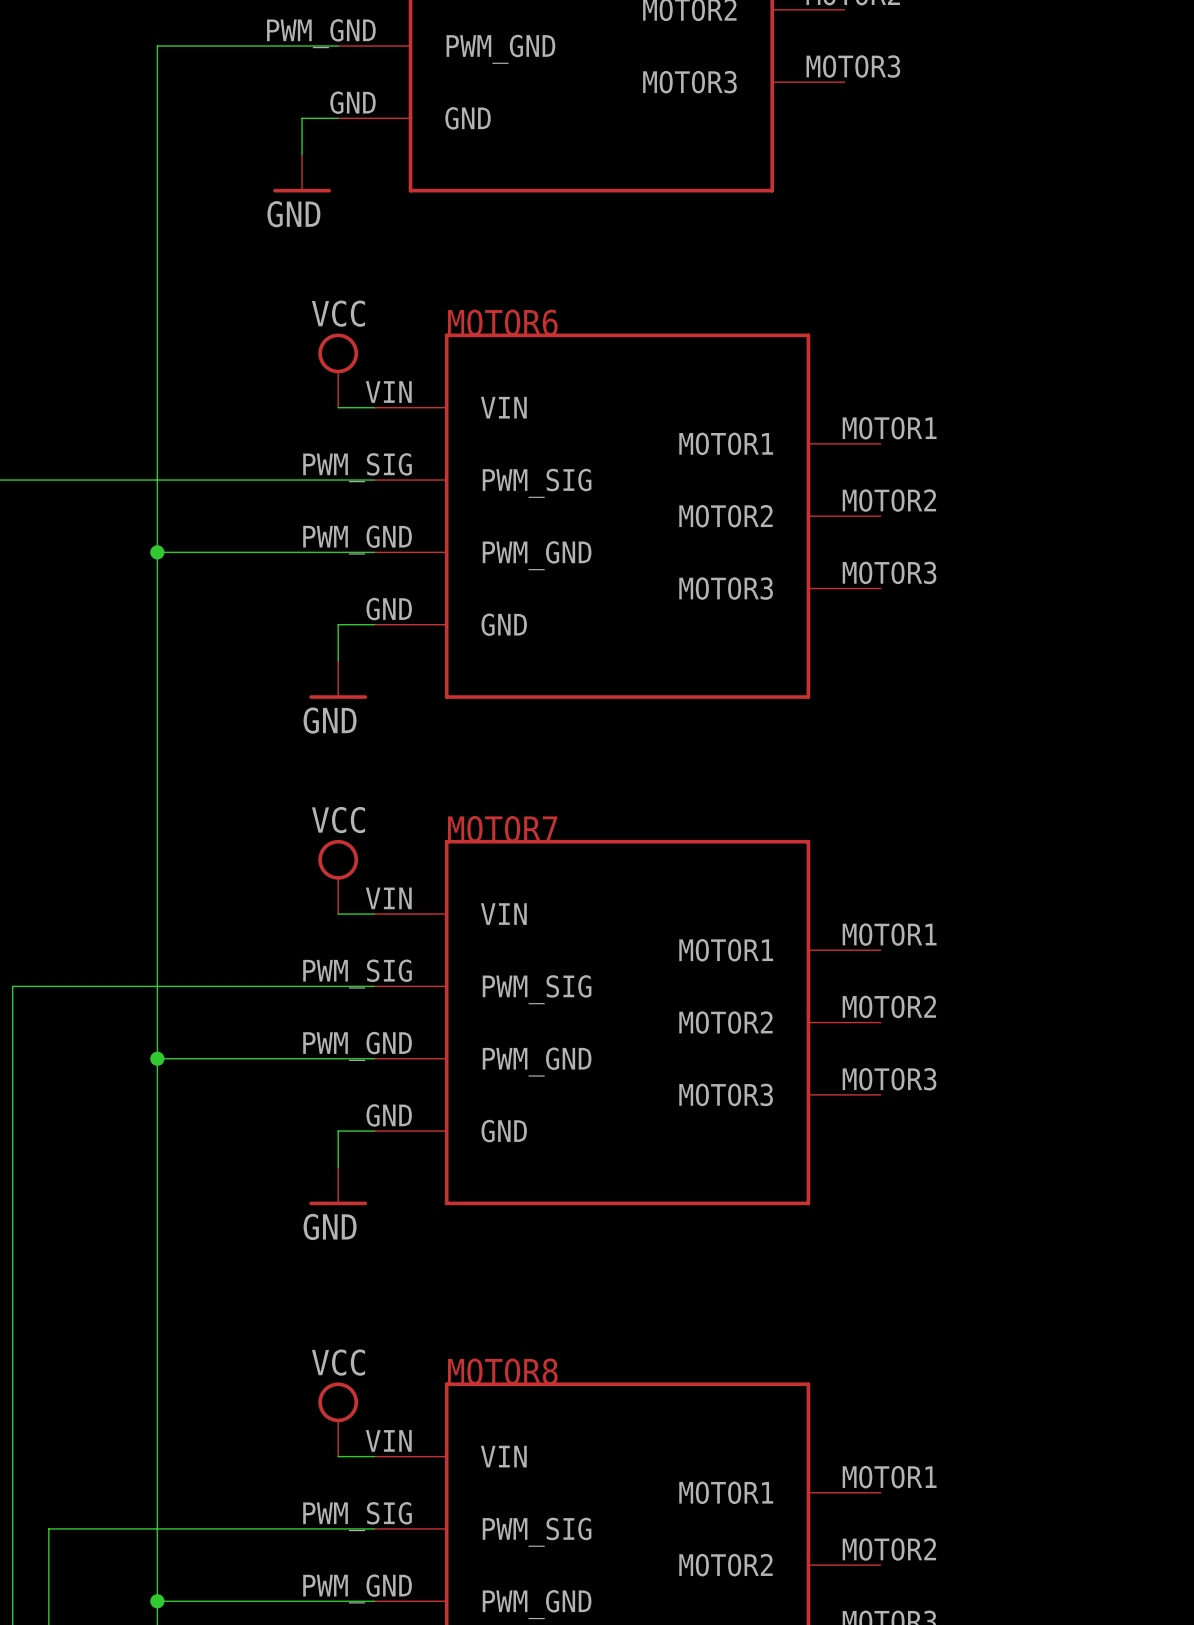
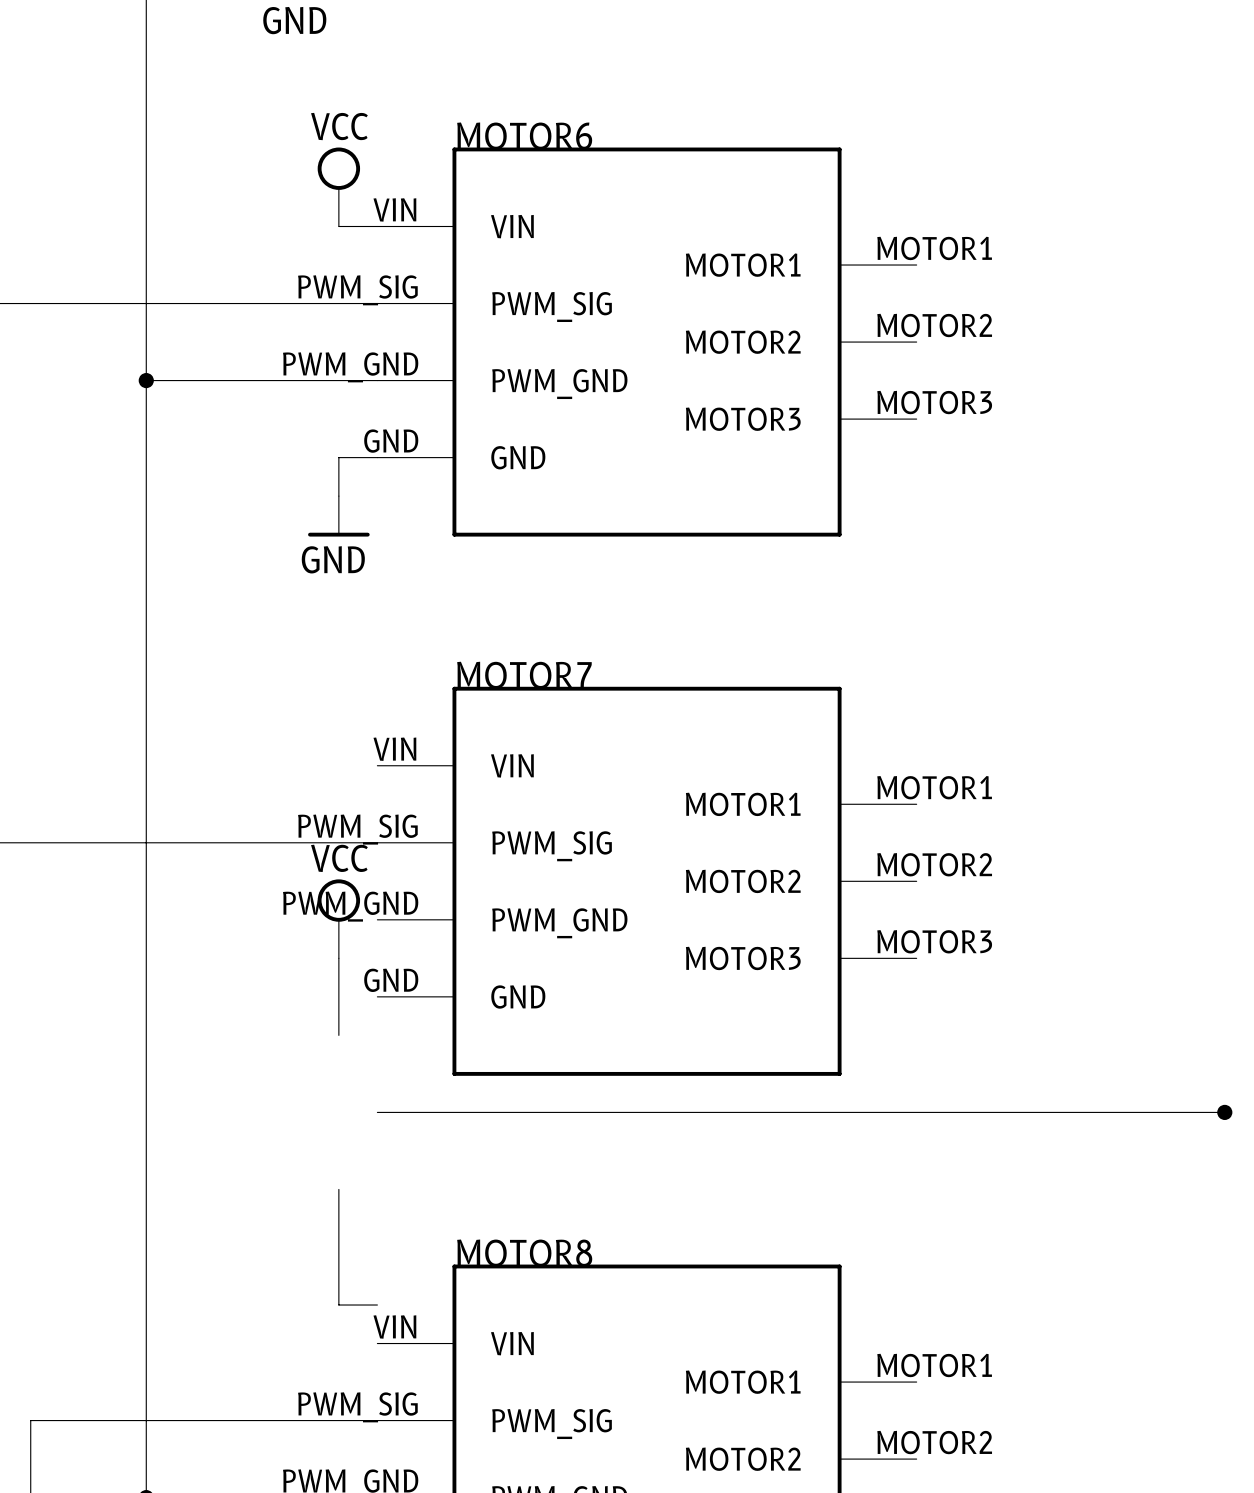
power symbol: VCC (338, 876) -> none
wire: (338, 914) (374, 914) -> none
power symbol: none -> VCC (338, 918)
wire: (157, 1058) (374, 1058) -> none
junction: (157, 1058) -> none
wire: (338, 1131) (374, 1131) -> (338, 996) (338, 958)
power symbol: GND (338, 1186) -> none
wire: none -> (377, 1112) (1224, 1112)
junction: none -> (1224, 1112)
wire: none -> (338, 1189) (338, 1305) (377, 1305)
power symbol: VCC (338, 1419) -> none
wire: (338, 1456) (374, 1456) -> none

